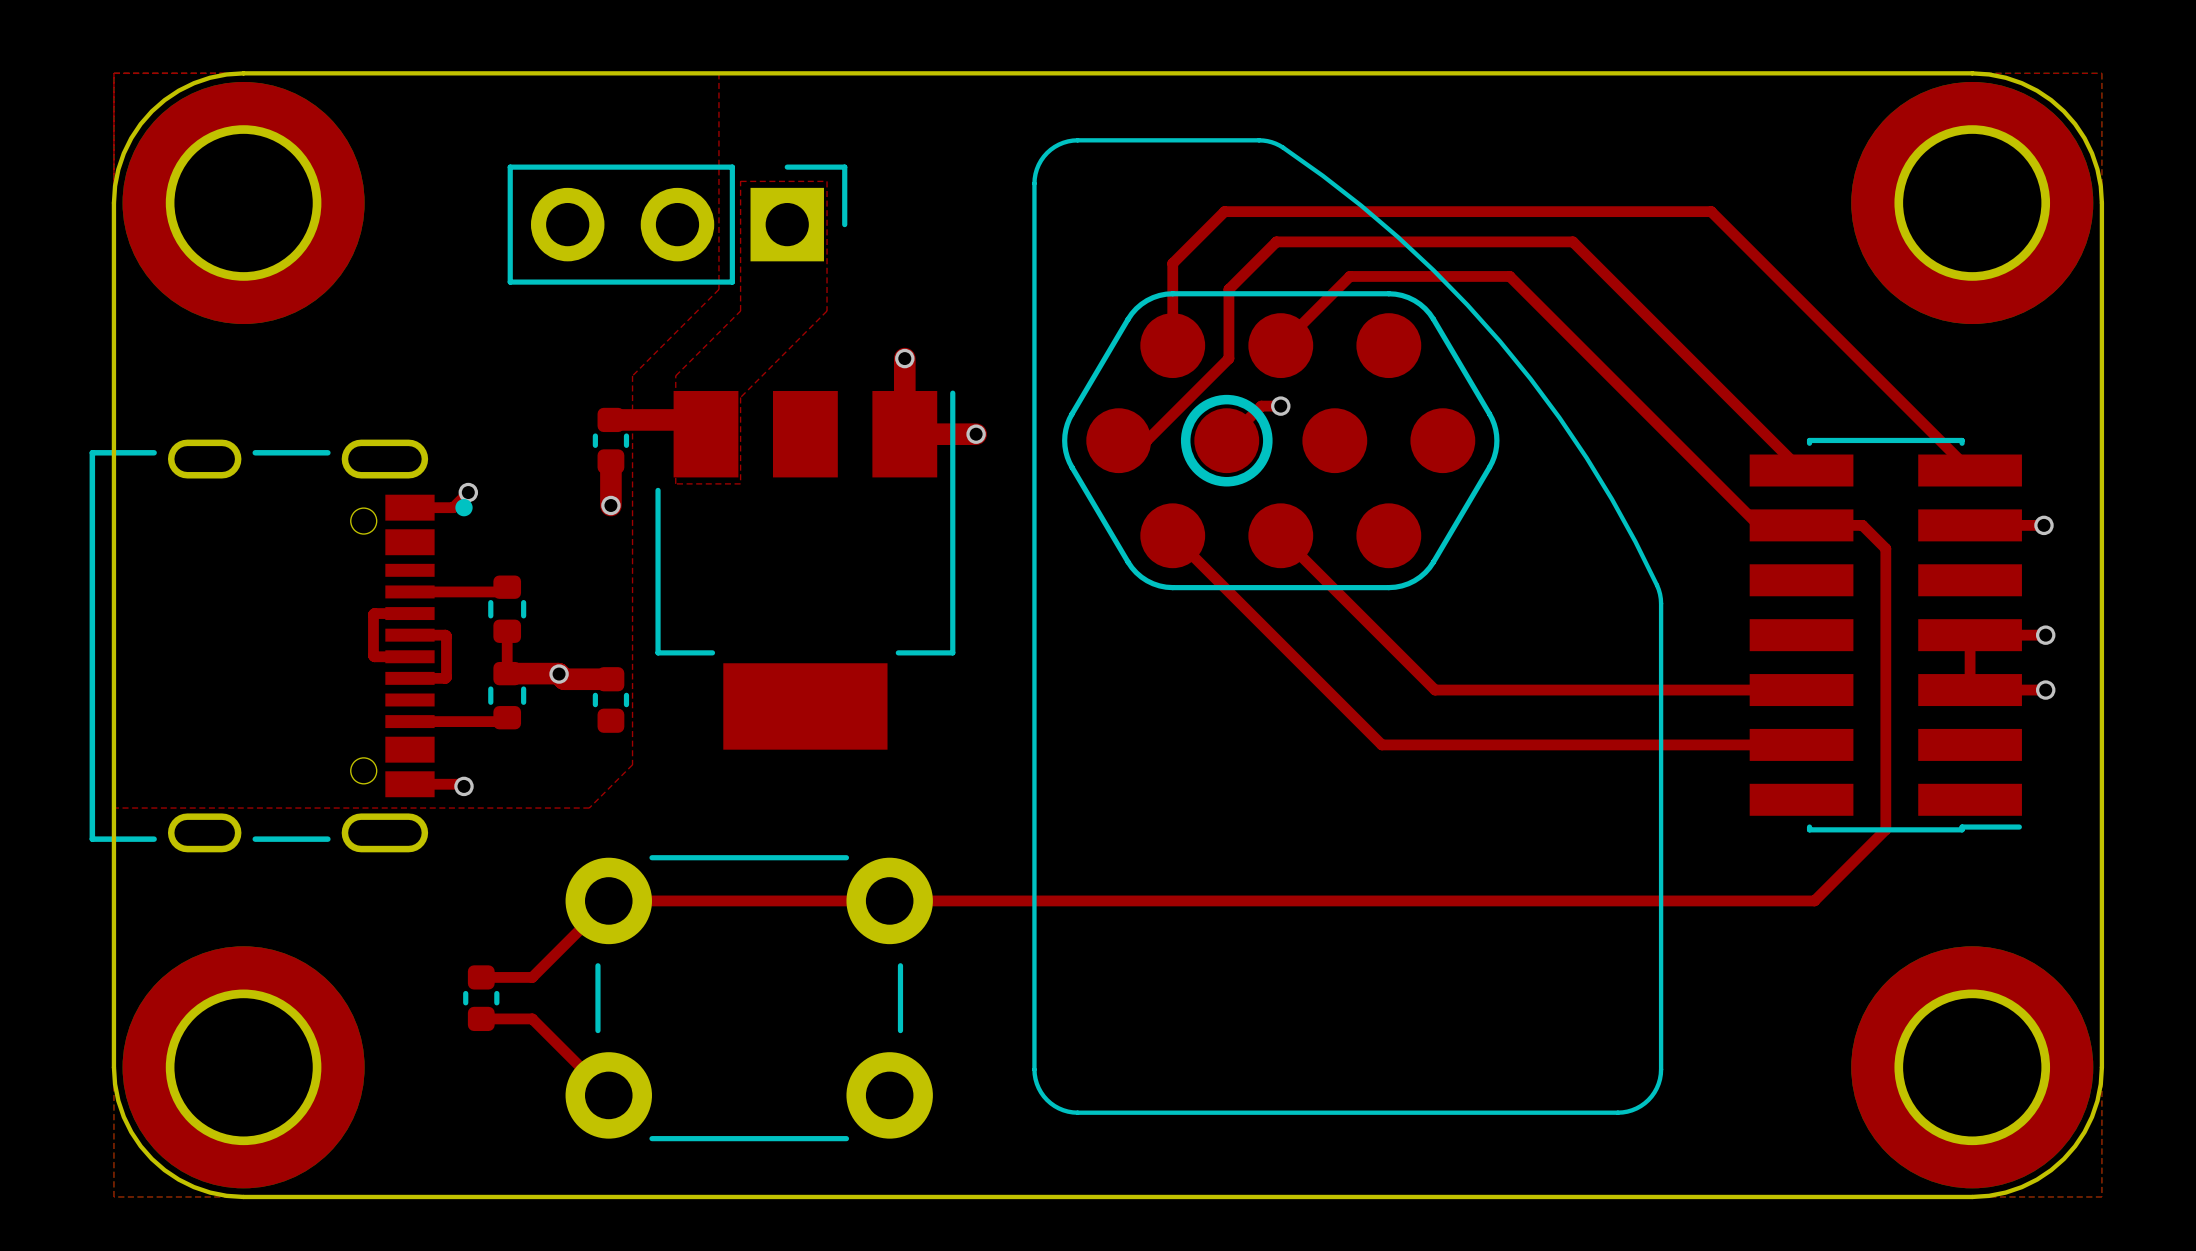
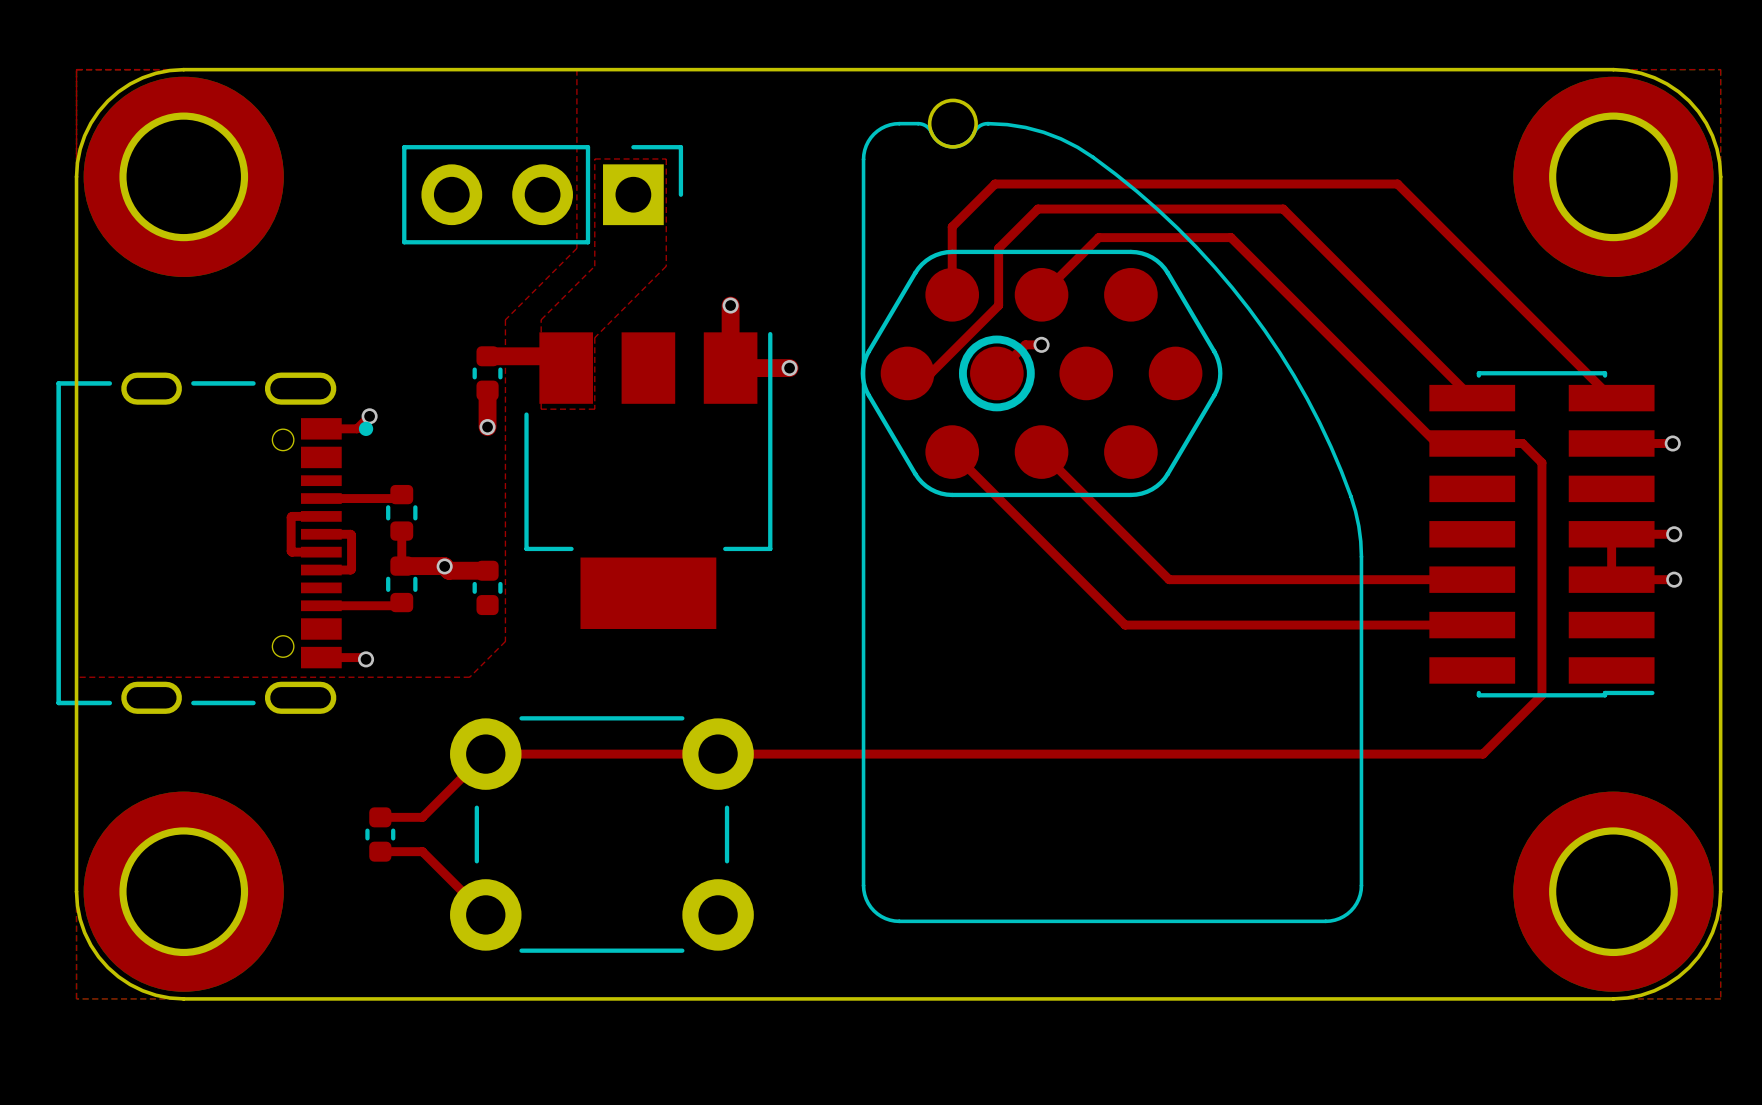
drawing shape: [1032, 138, 1664, 1115] -> [861, 98, 1364, 924]

